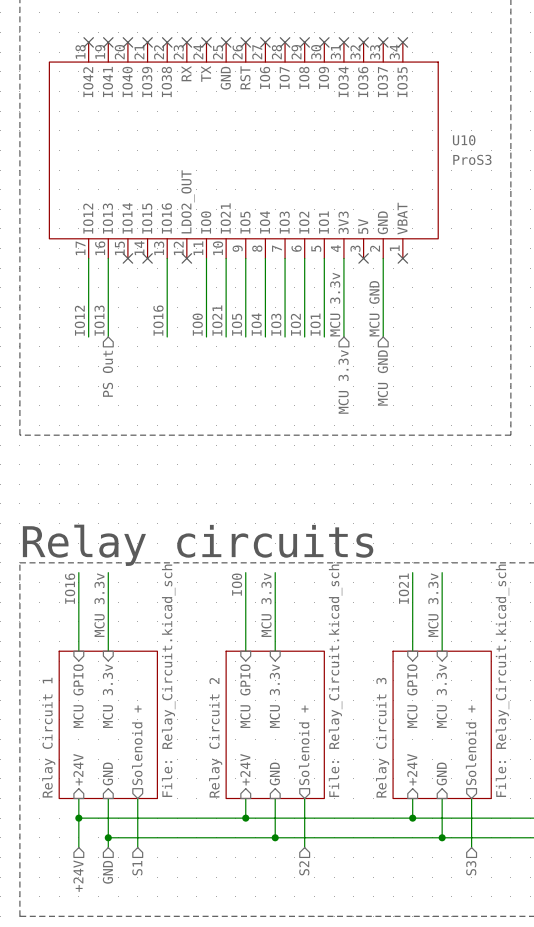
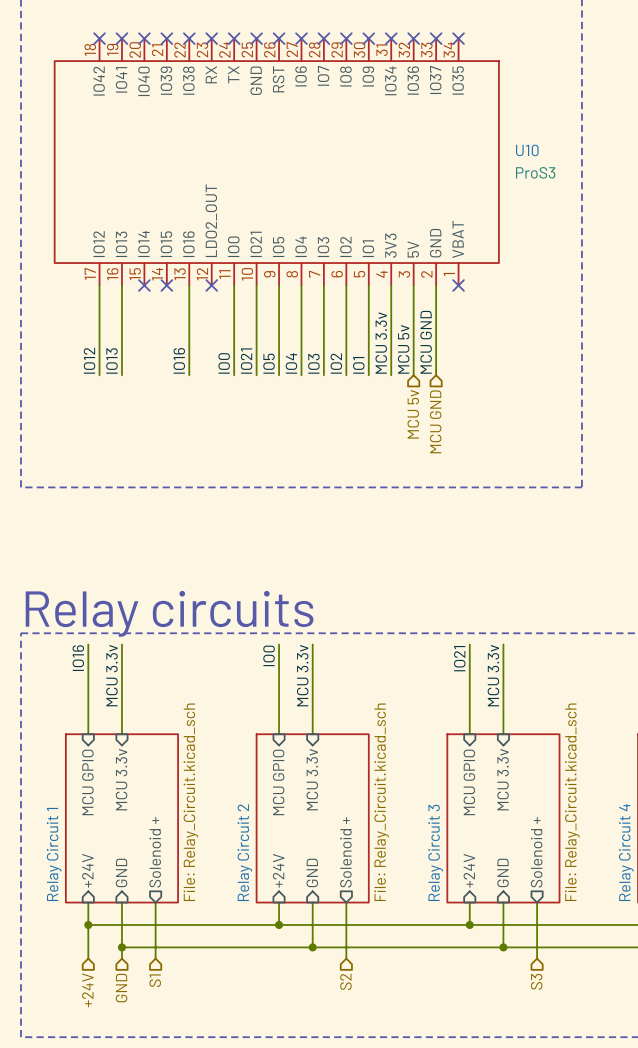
wire: none -> (413, 285) (413, 375)
no-connect mark: (363, 258) -> none
label: none -> MCU 5v (403, 349)
hierarchical label: PS Out (107, 373) -> none
hierarchical label: MCU 3.3v (343, 381) -> MCU 5v (413, 414)

